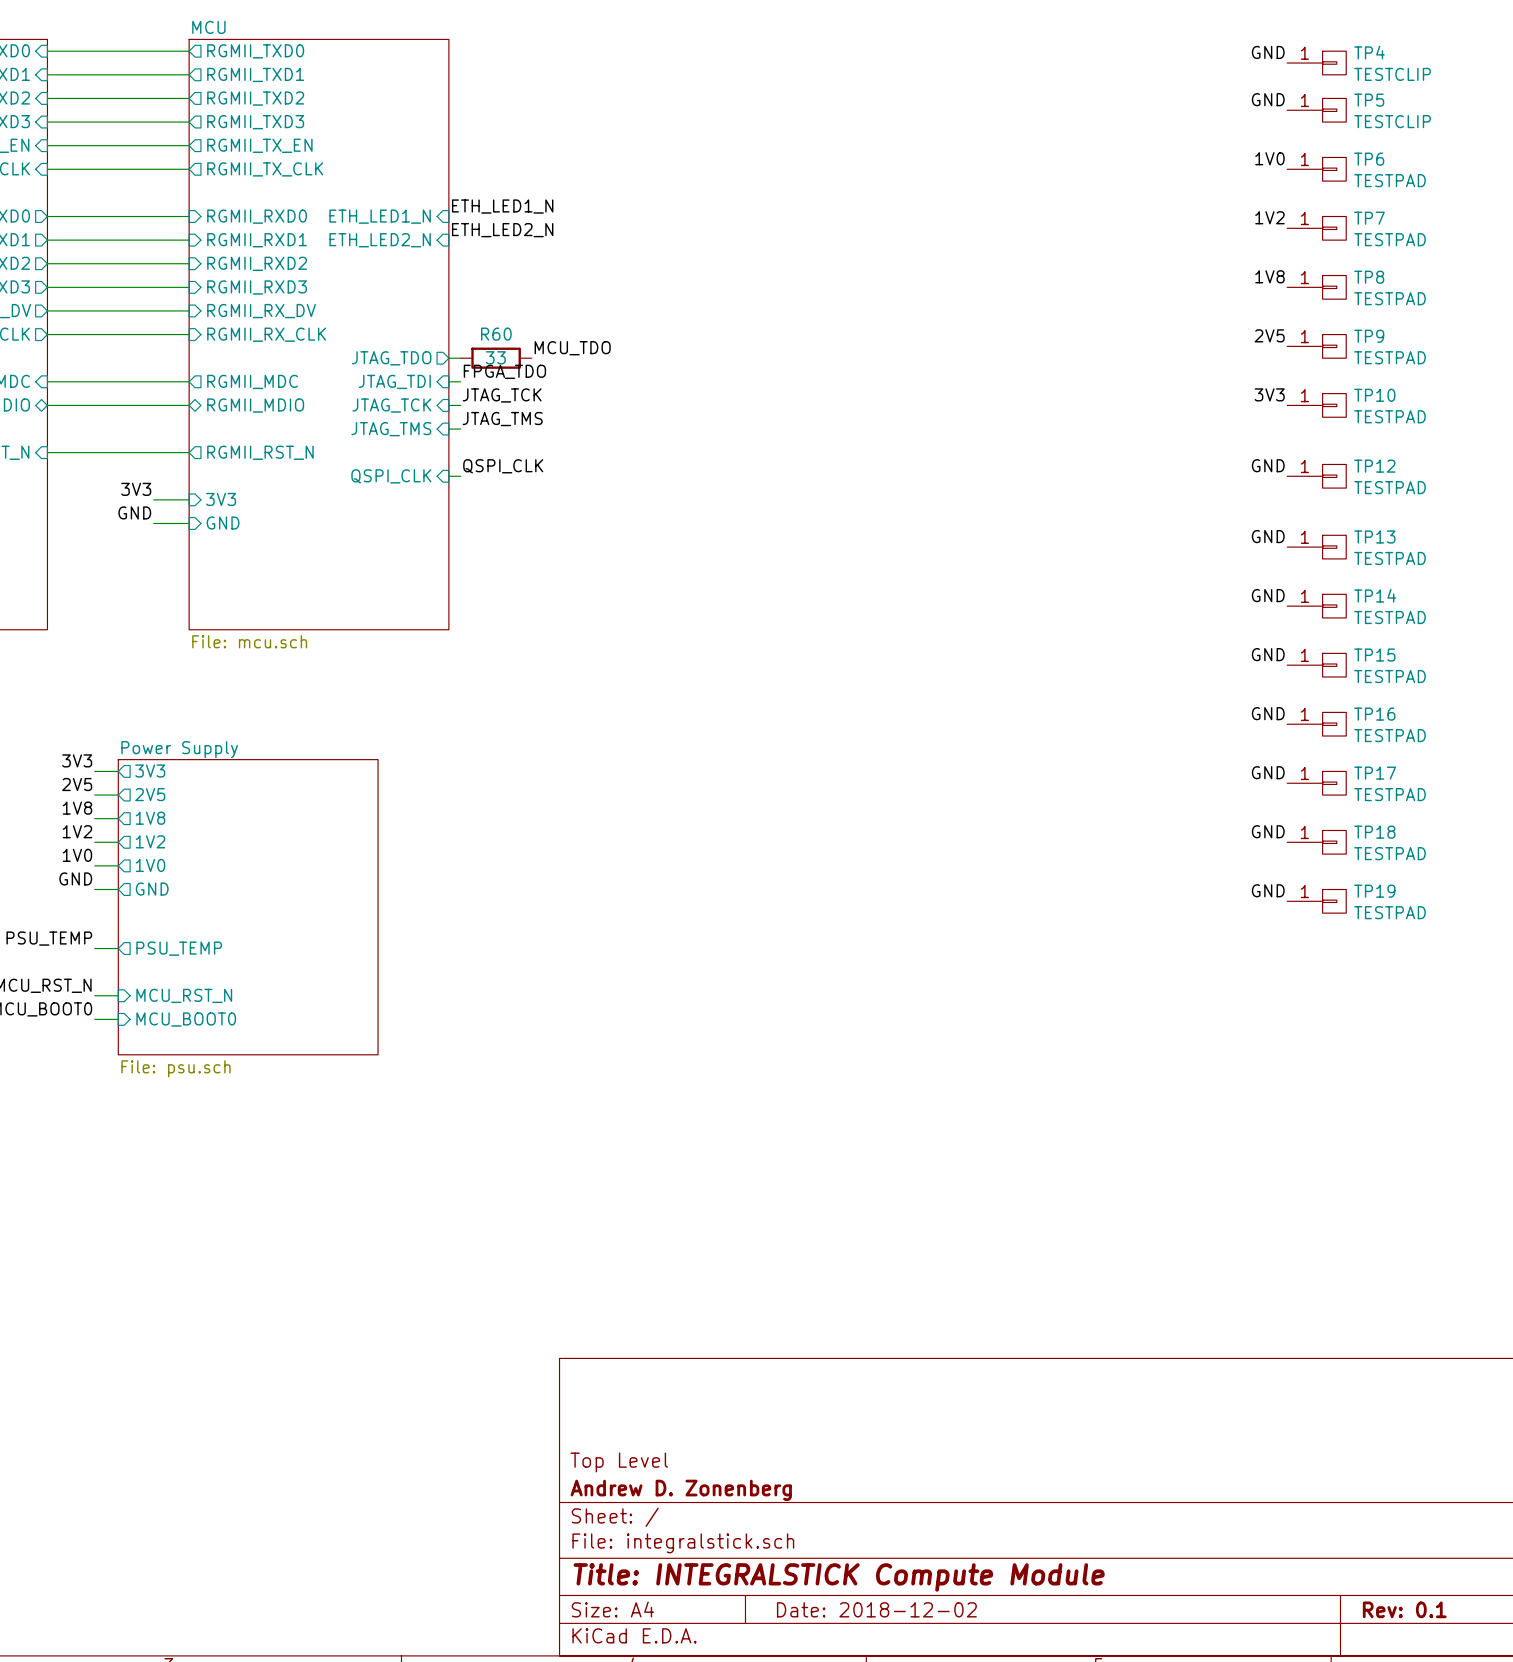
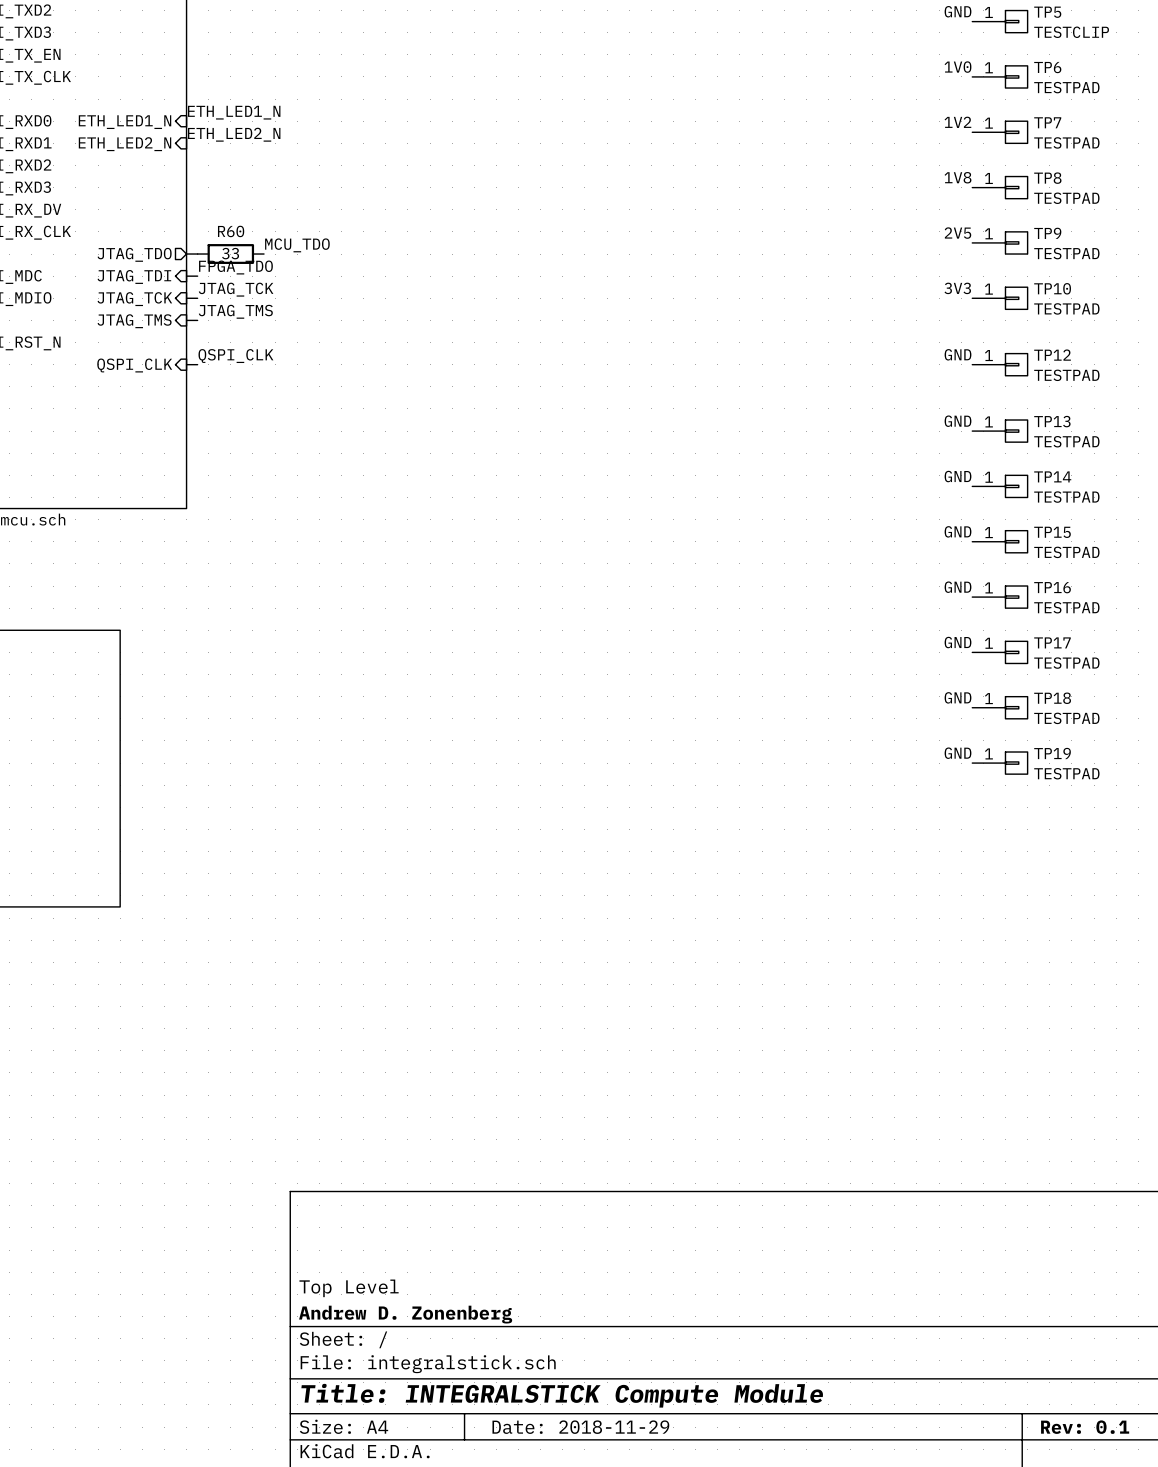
title block: Date: 2018-12-02 (876, 1609) -> Date: 2018-11-29 (580, 1427)

